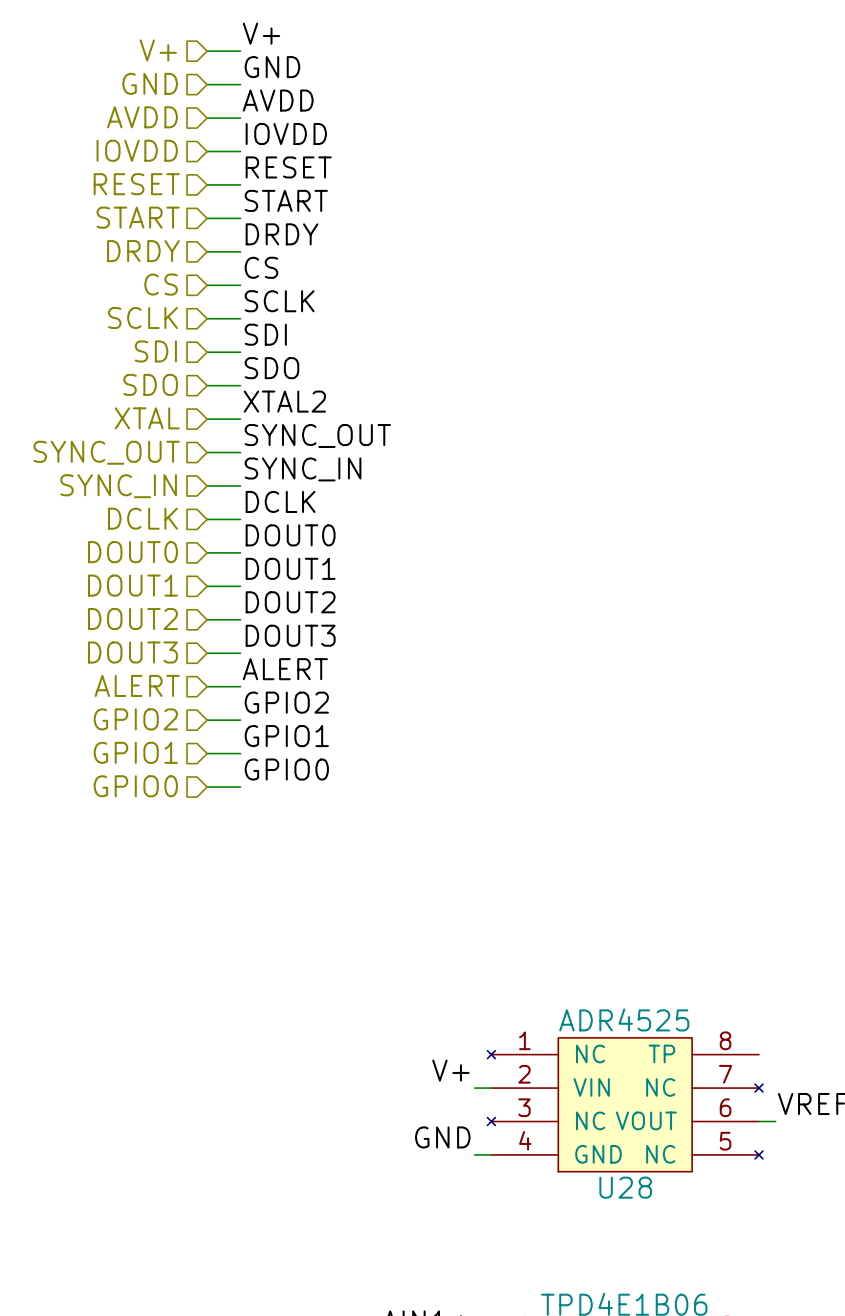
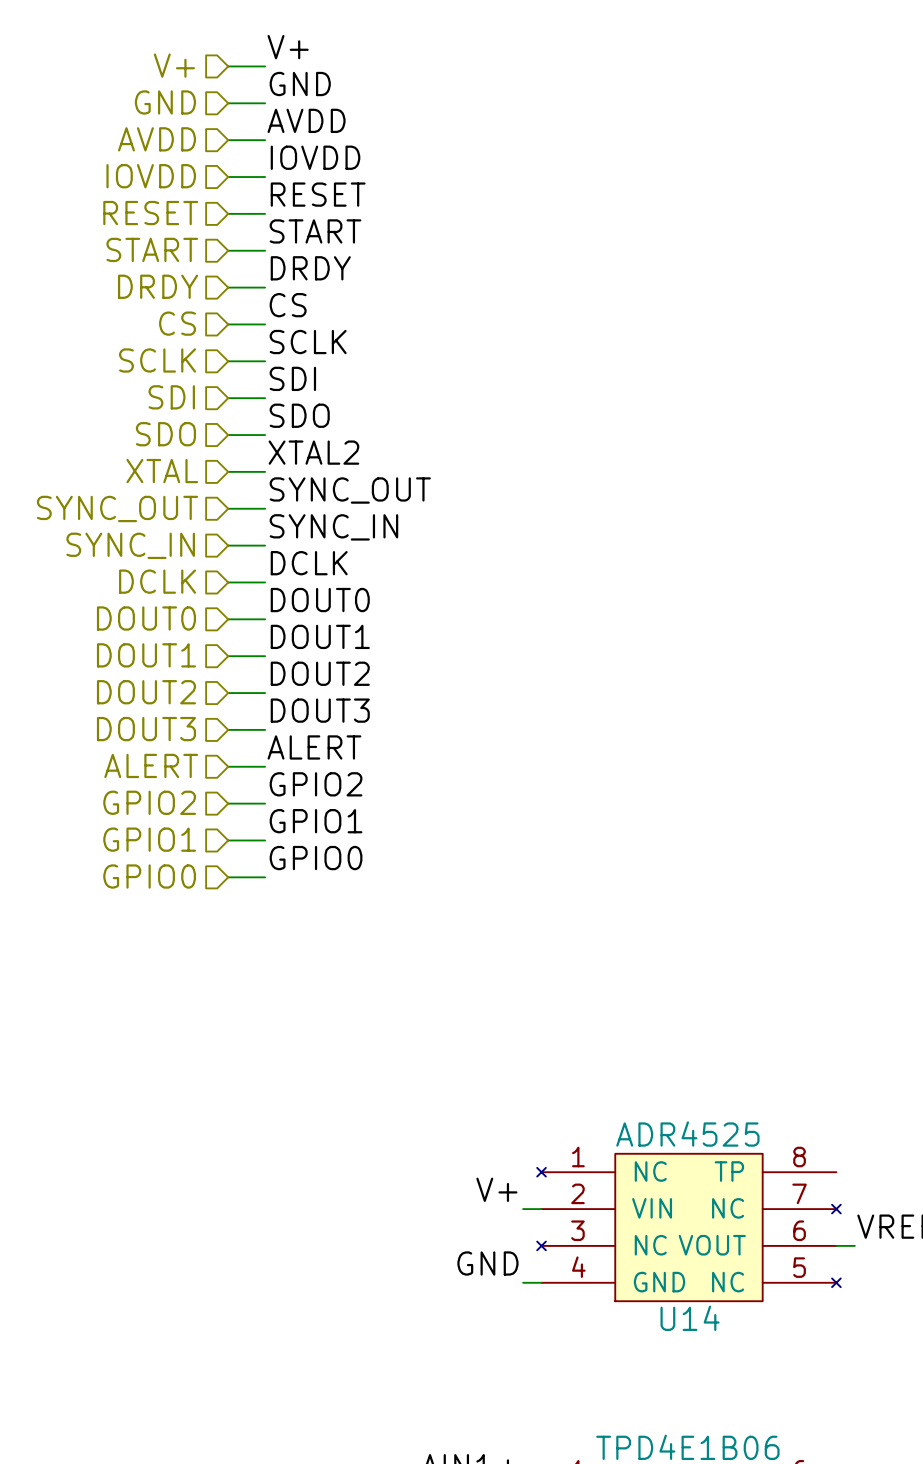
U28 name: U28 (625, 1187) -> U14 (690, 1318)

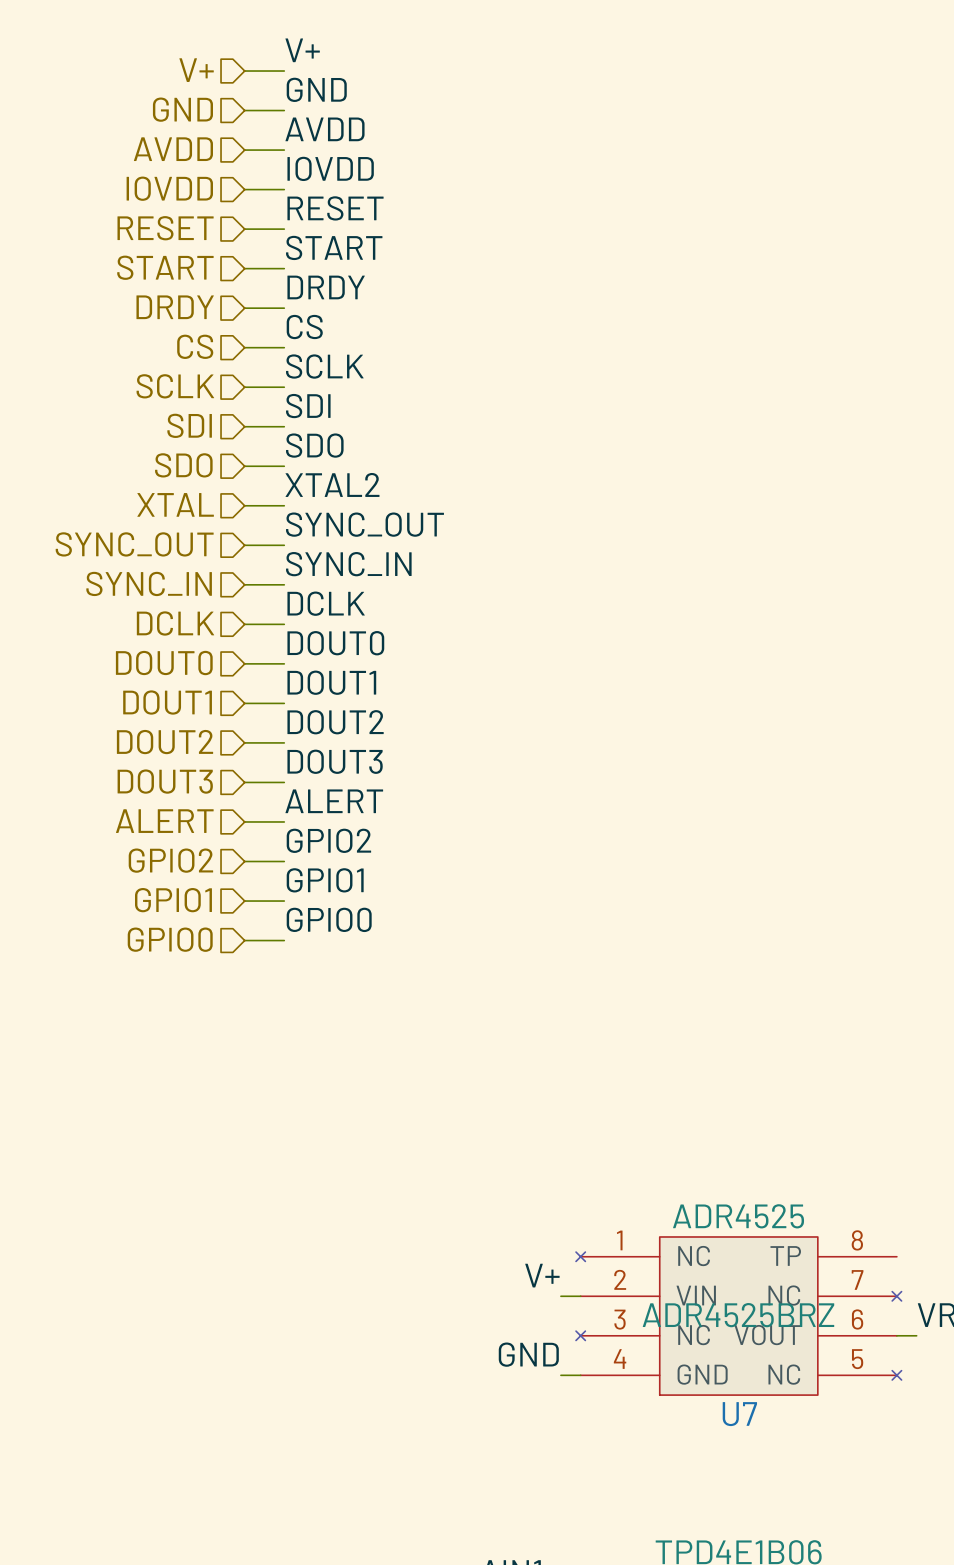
U14 text: none -> ADR4525BRZ (738, 1315)
U14 name: U14 (690, 1318) -> U7 (739, 1414)

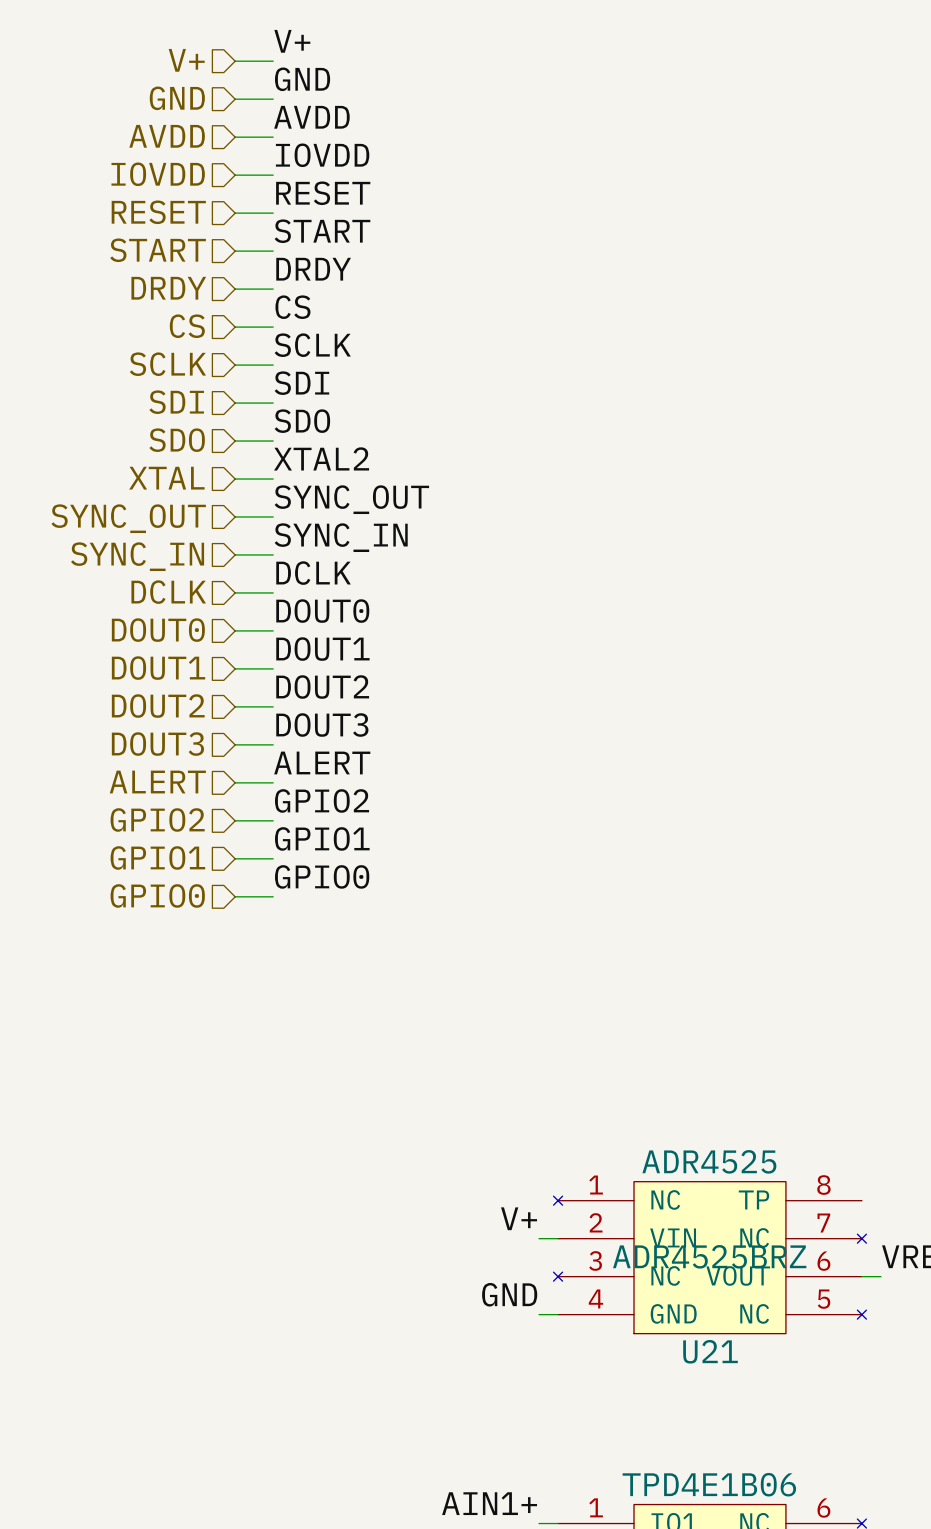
U7 name: U7 (739, 1414) -> U21 (710, 1351)

